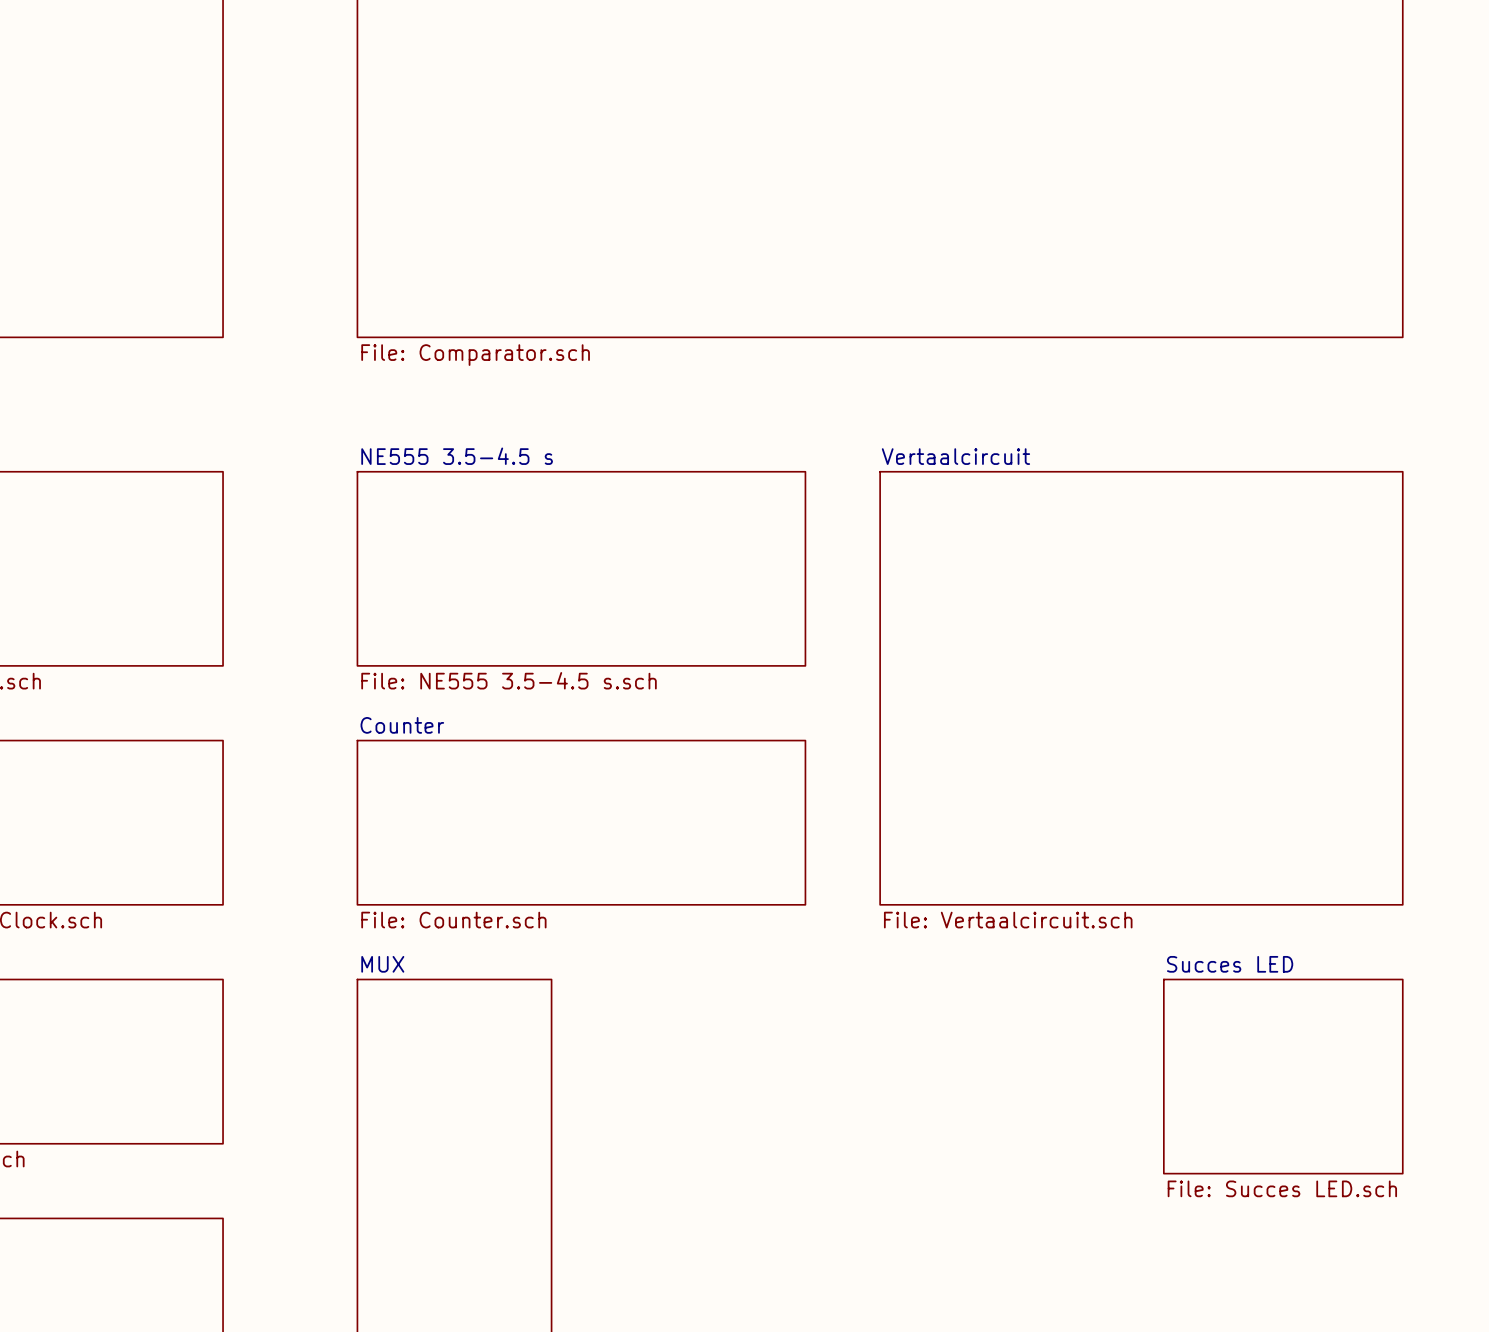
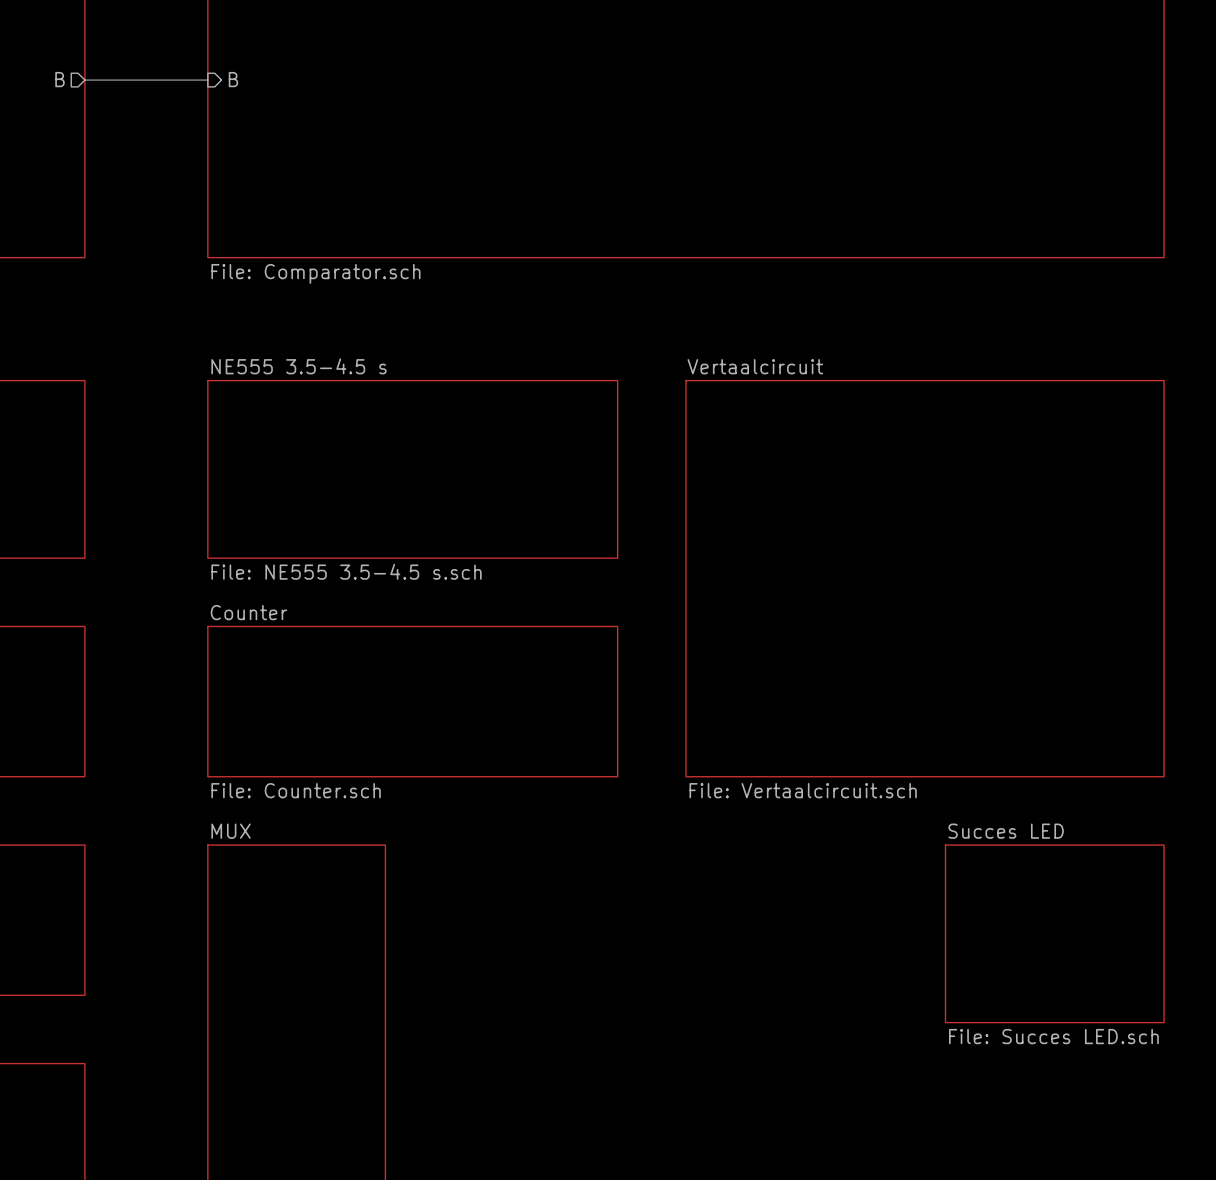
sheet pin: none -> B (59, 79)
sheet pin: none -> B (233, 79)
bus: none -> (84, 80) (207, 80)

